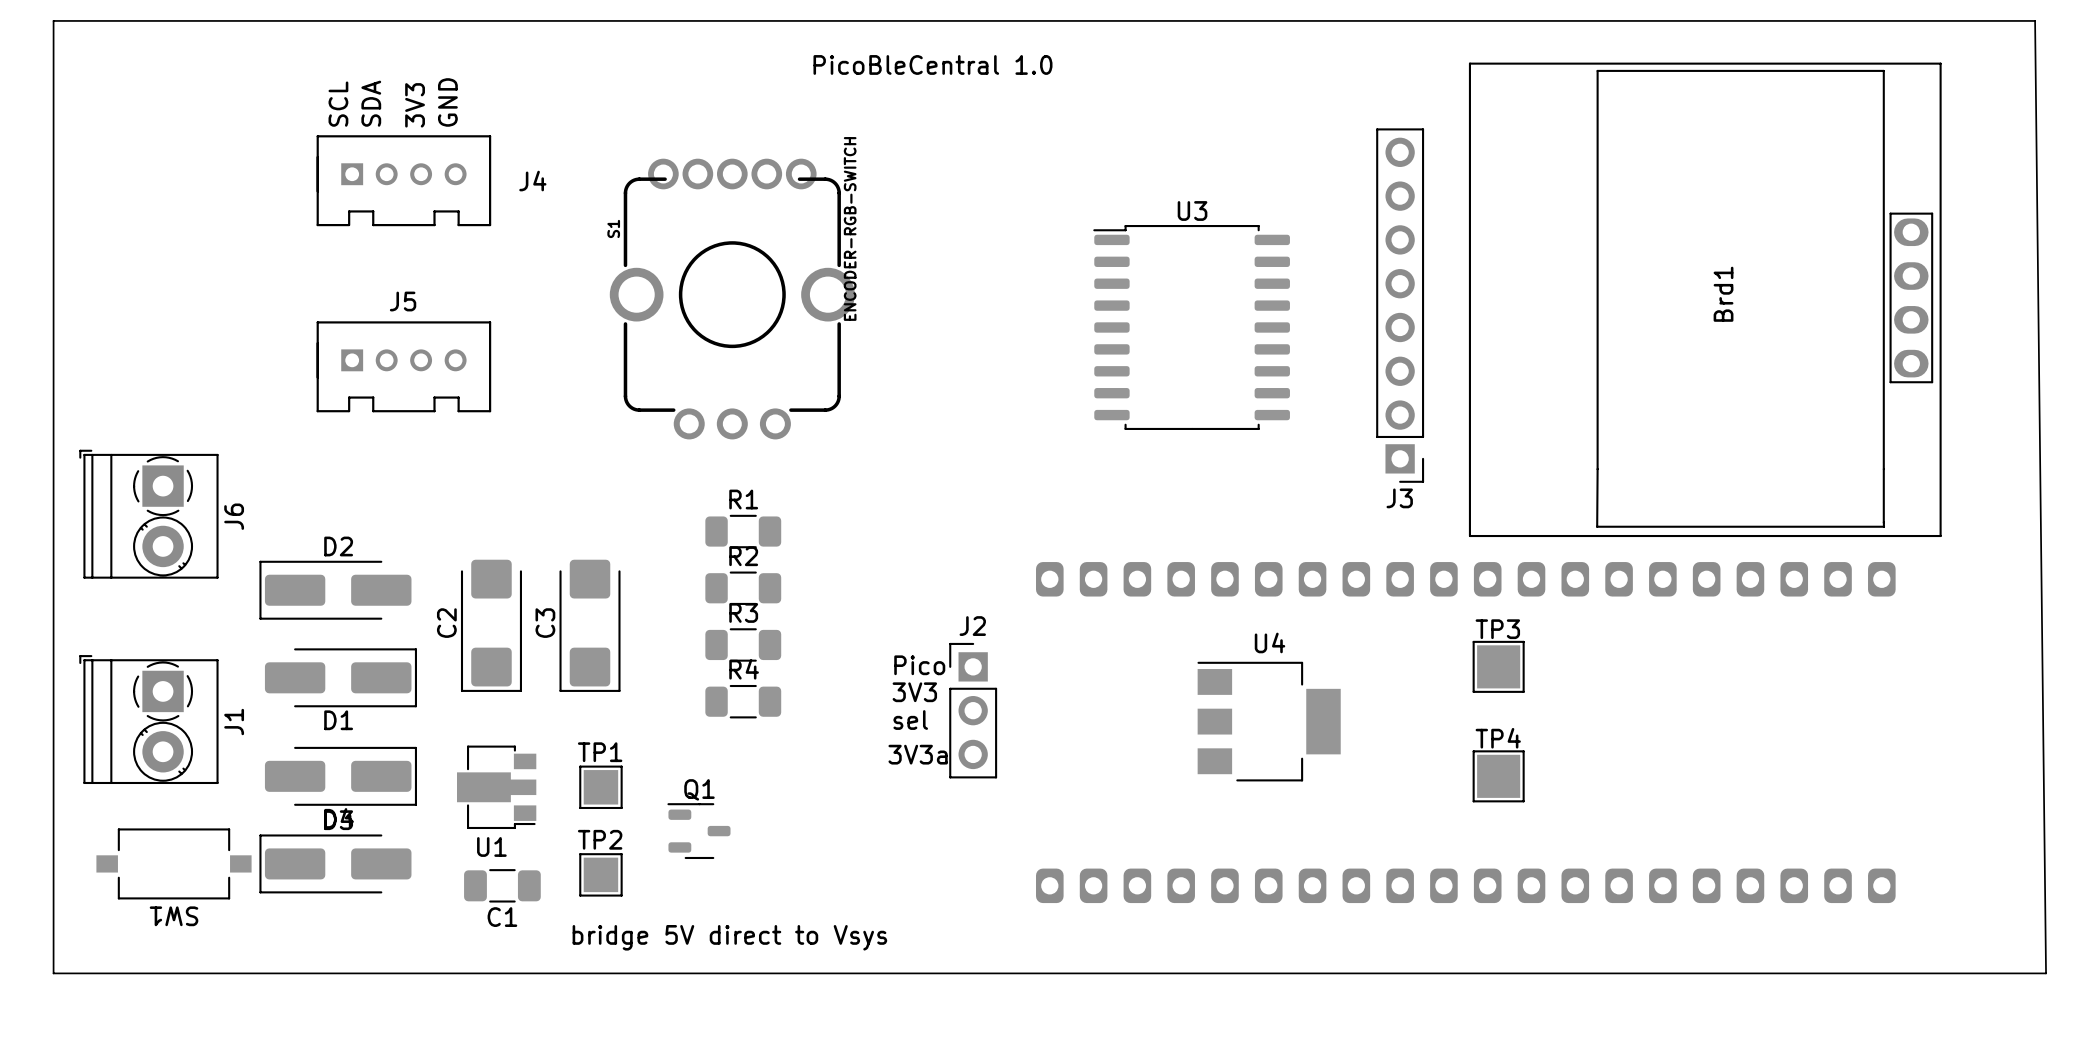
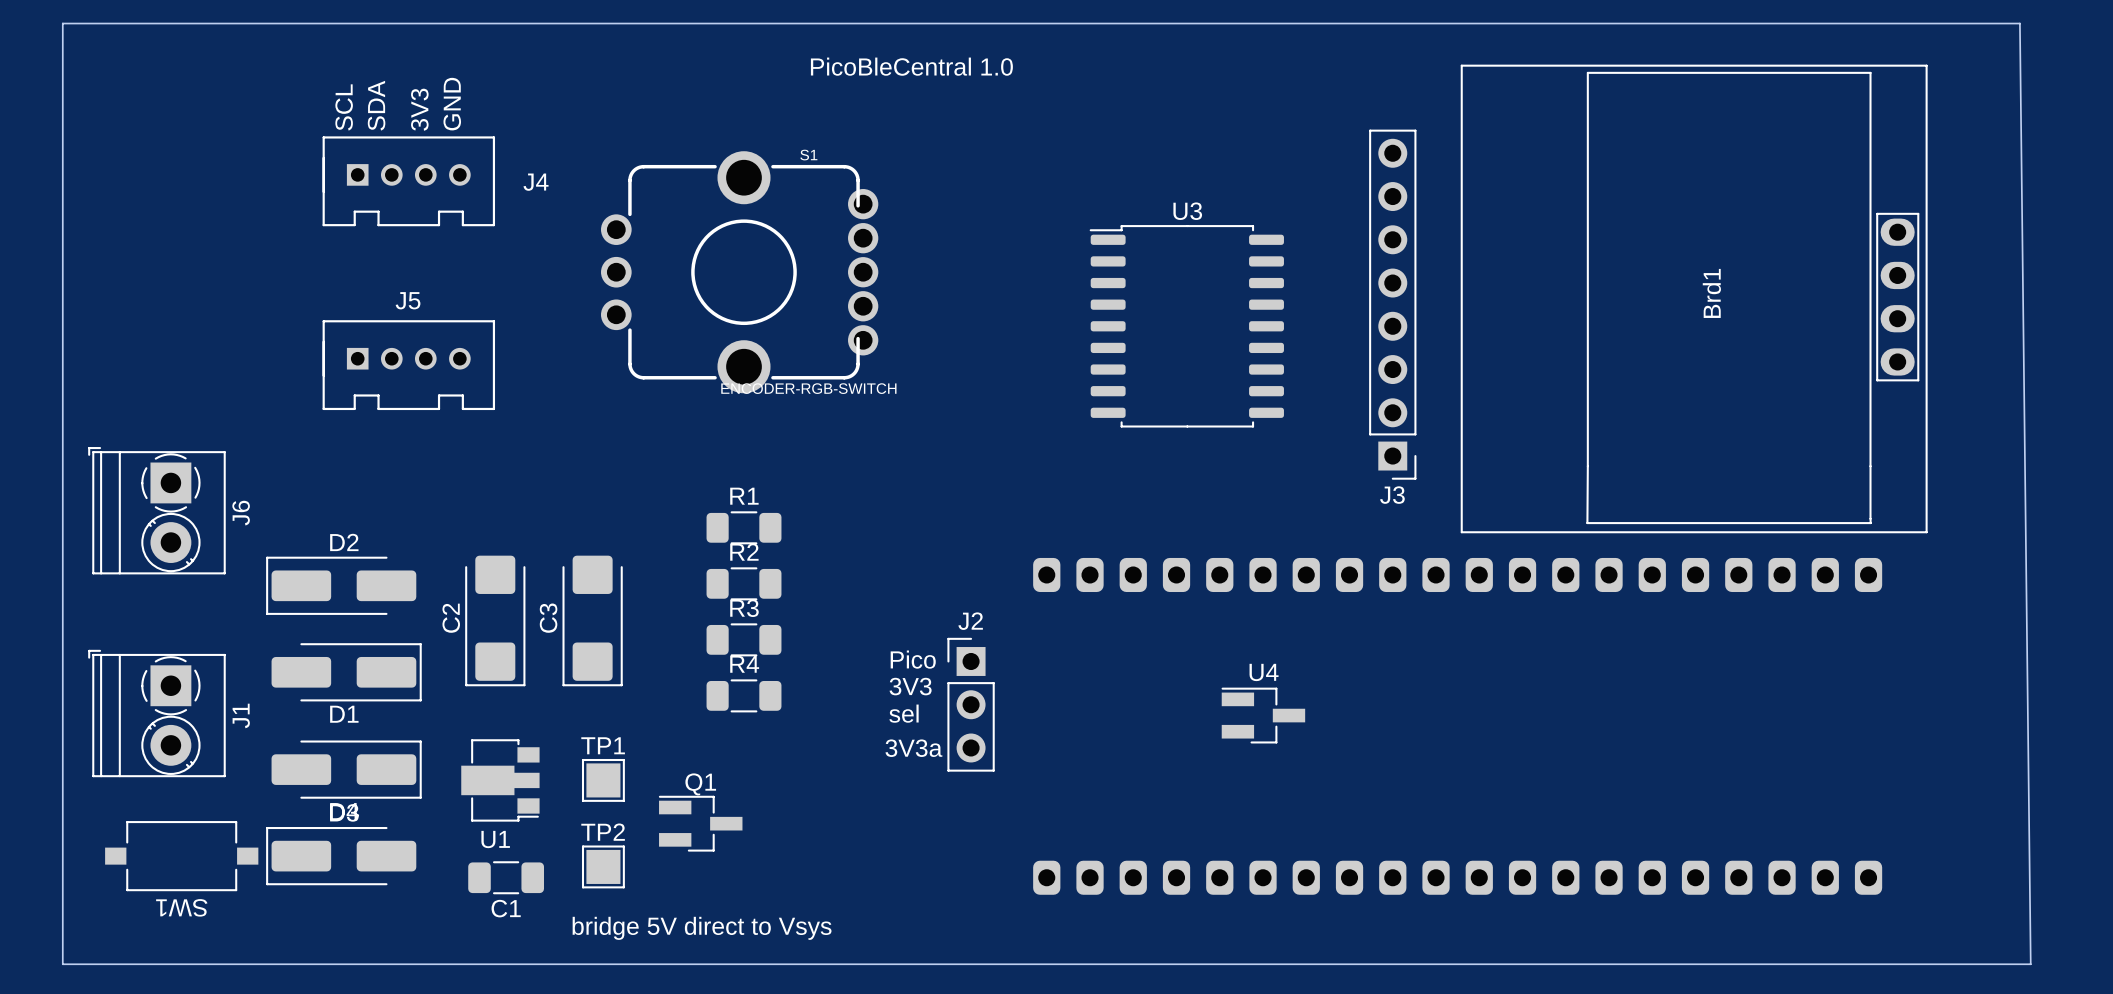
S1 rotation: 0° (732, 299) -> 90° clockwise (739, 272)
U4 footprint: [1197, 661, 1341, 782] -> [1221, 687, 1306, 744]
TP3: (1498, 666) -> none
TP4: (1498, 776) -> none
Q1 footprint: [667, 803, 731, 860] -> [658, 795, 743, 852]

